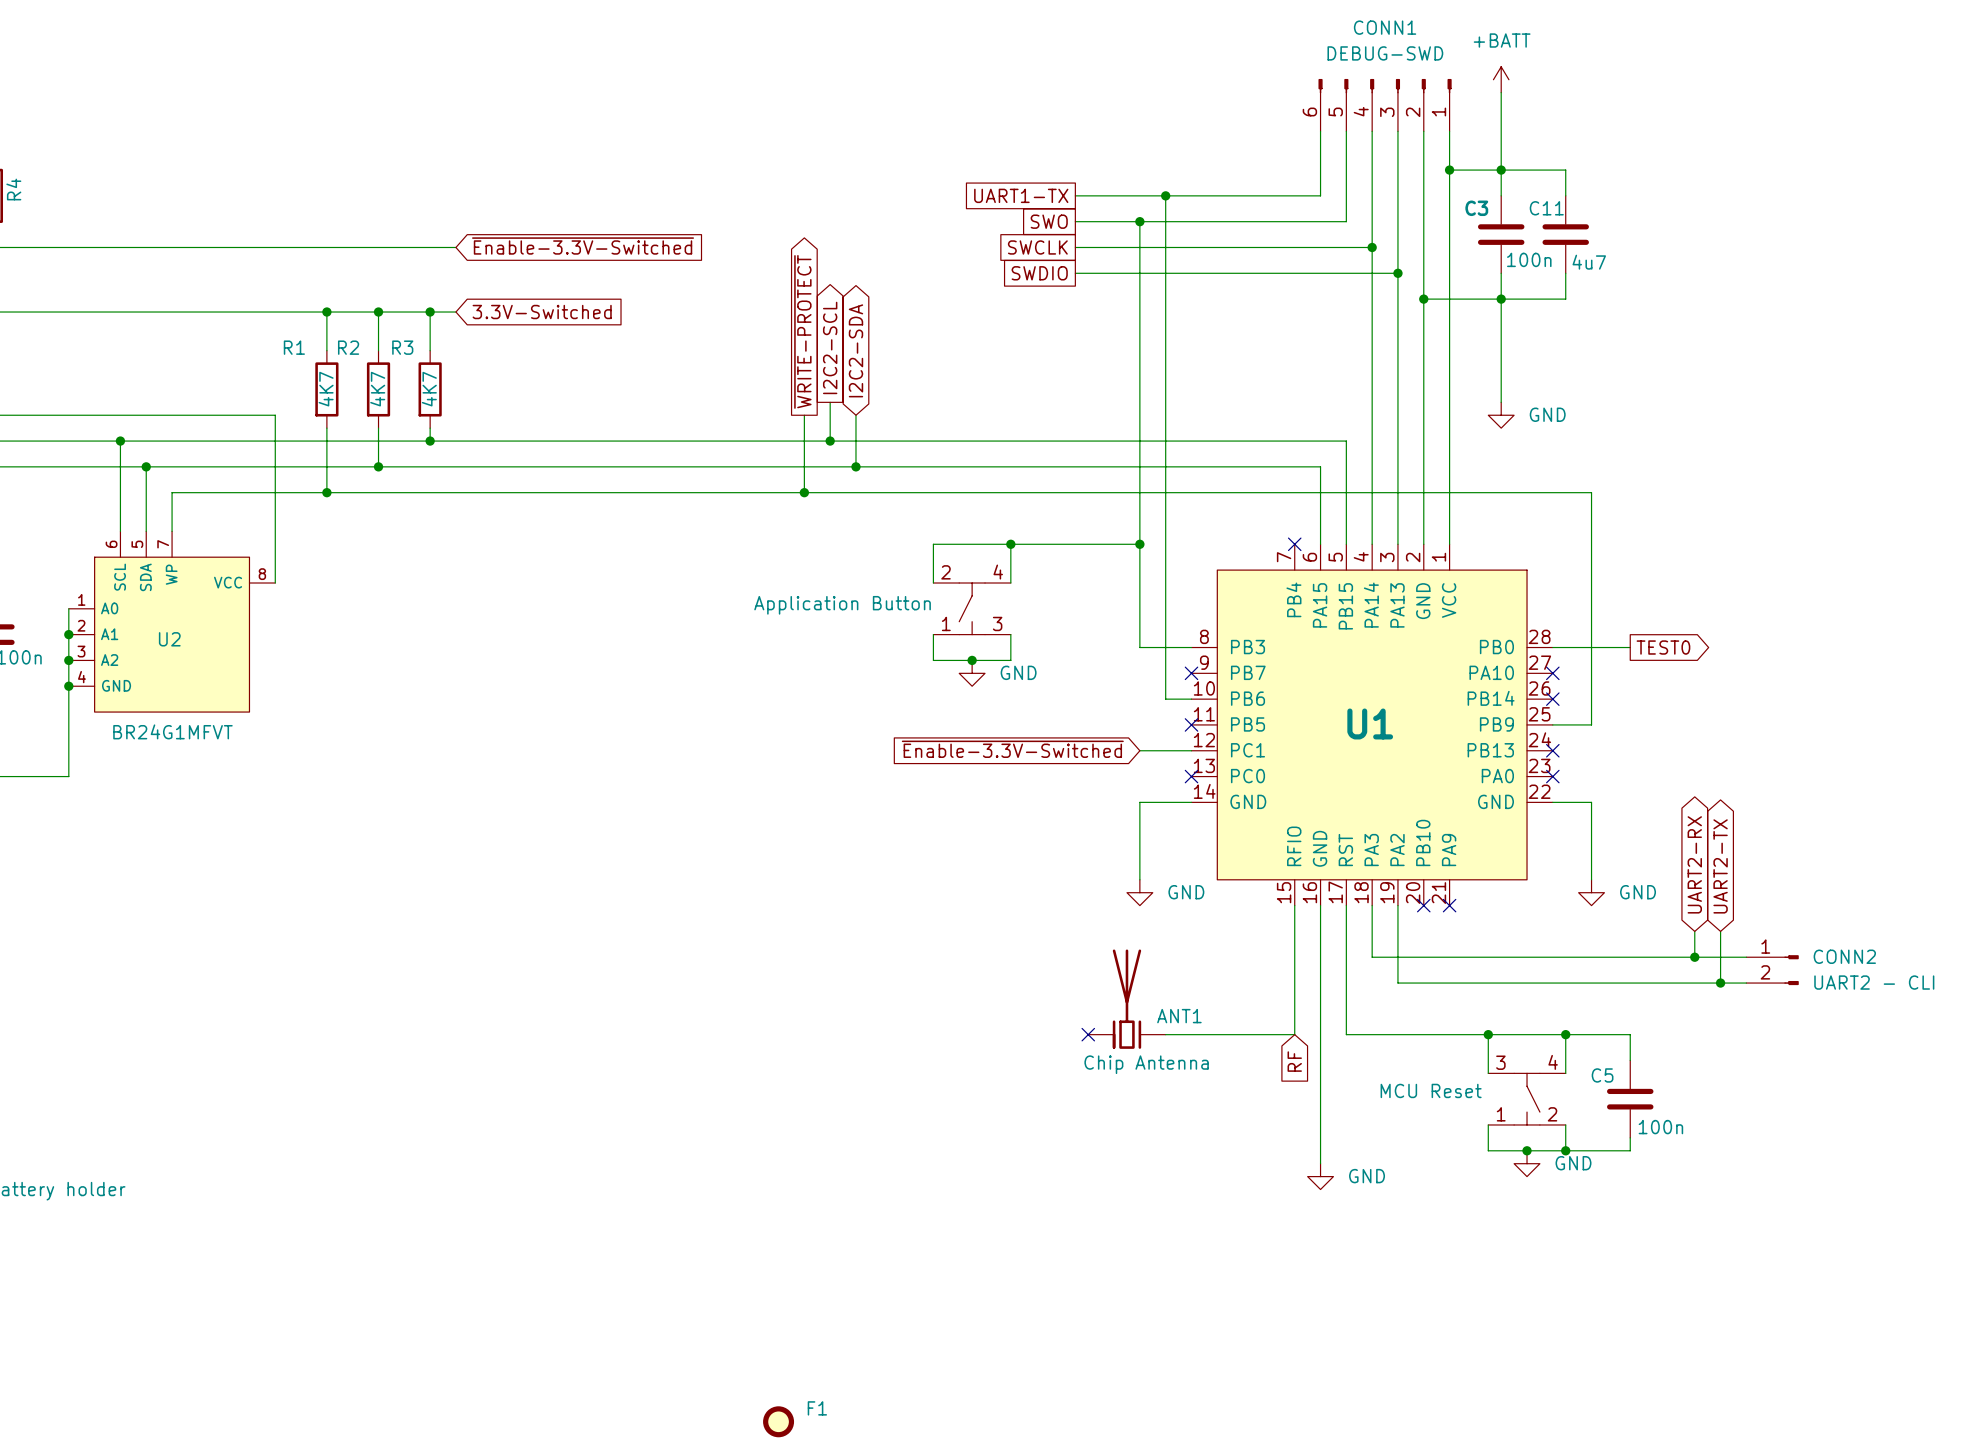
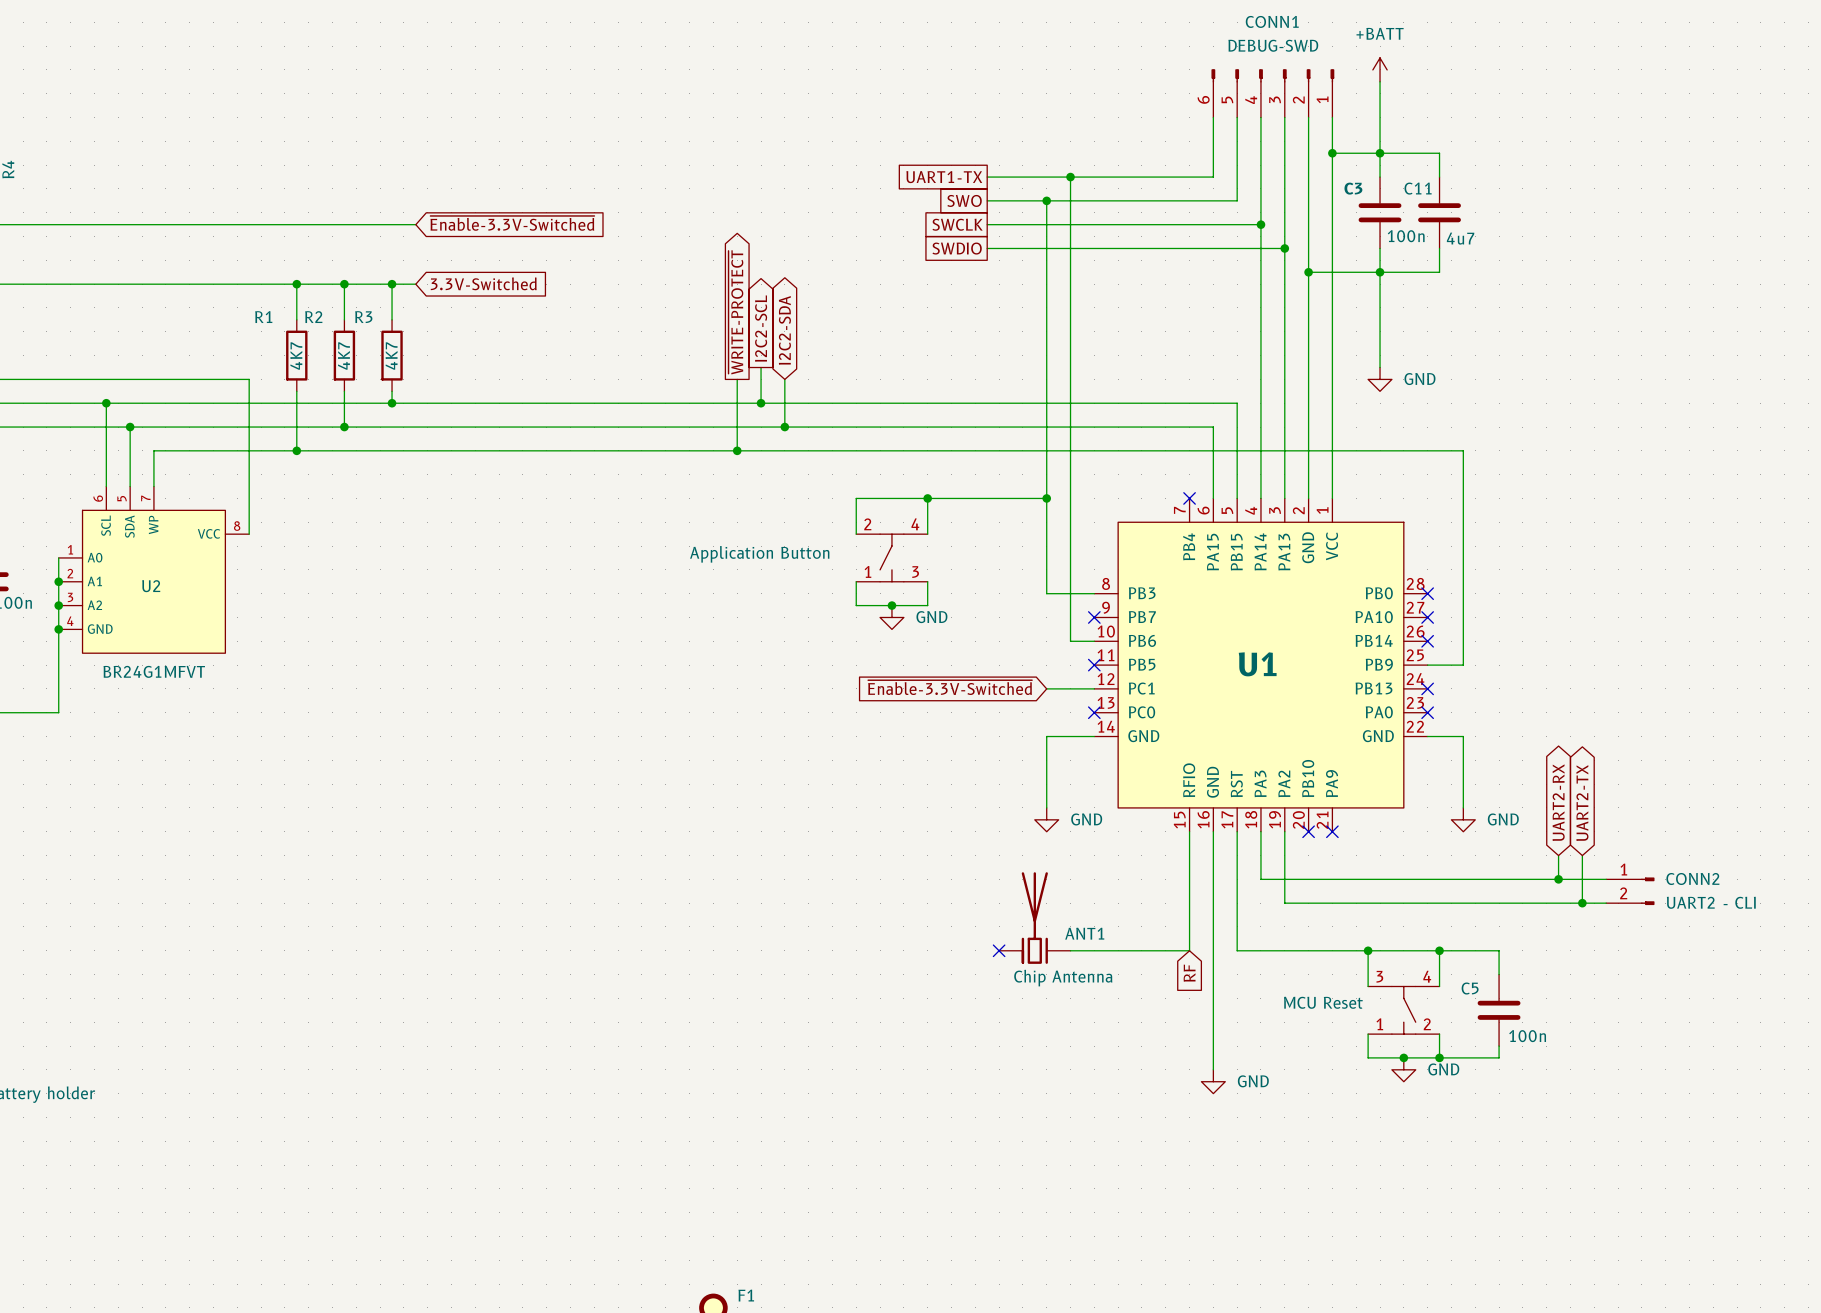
wire: (1552, 647) (1630, 647) -> none
no-connect mark: none -> (1427, 593)
global label: TEST0 (1663, 647) -> none

